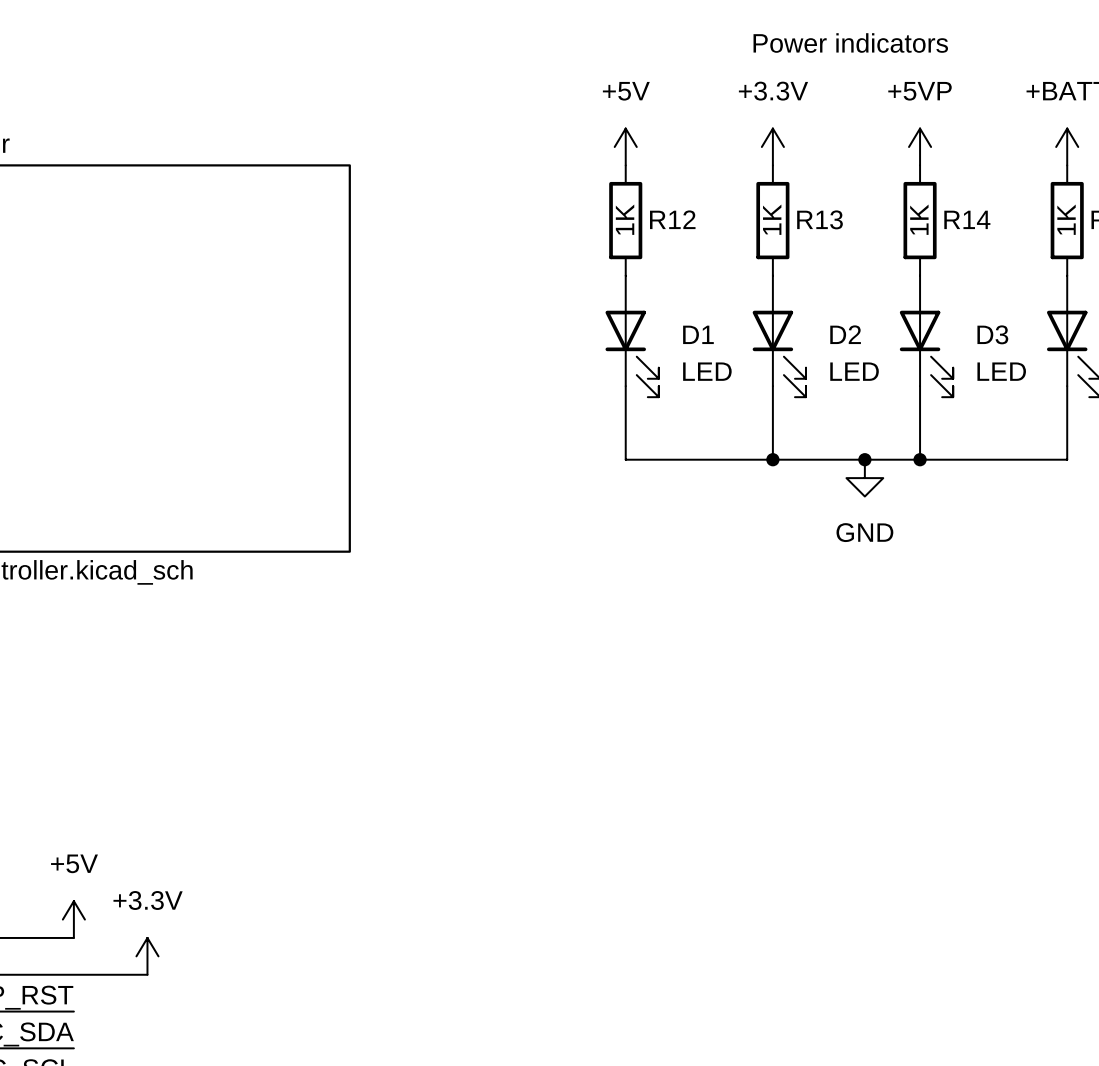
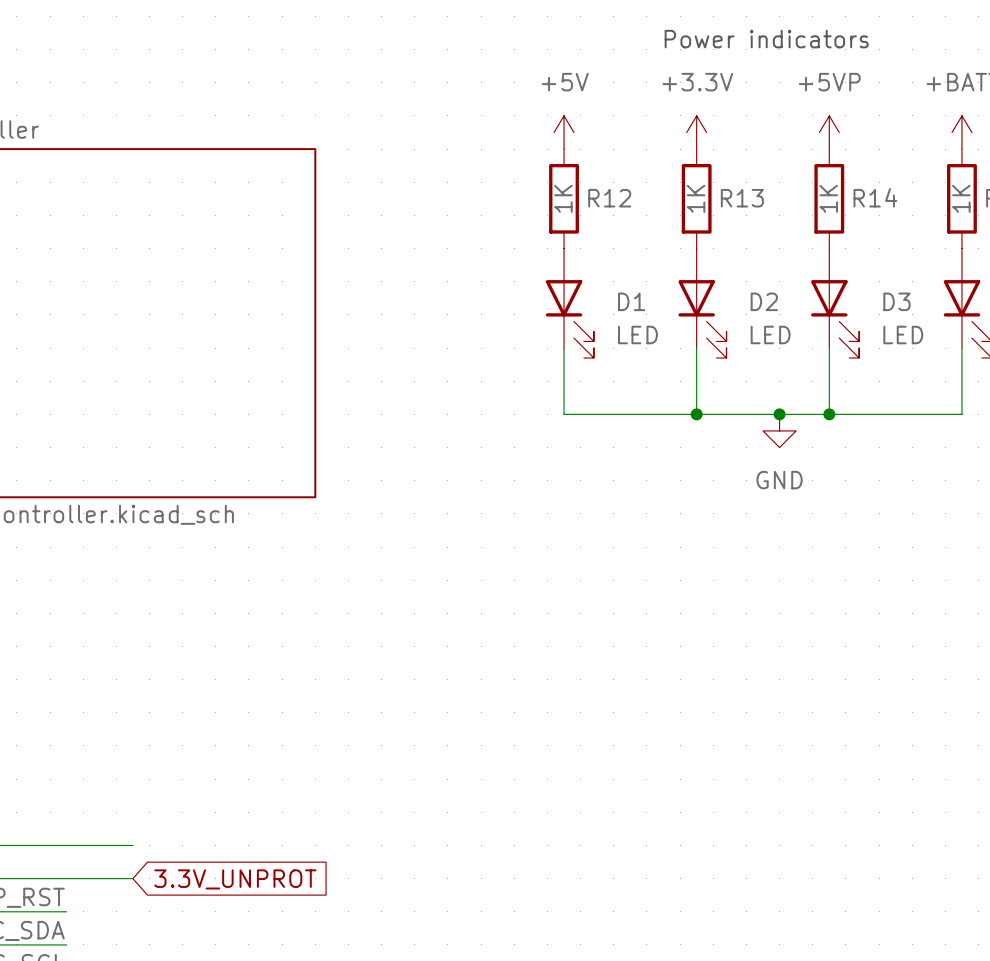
power symbol: +5V (73, 919) -> none
wire: none -> (66, 845) (132, 845)
power symbol: +3.3V (147, 956) -> none
global label: none -> 3.3V_UNPROT (235, 879)

